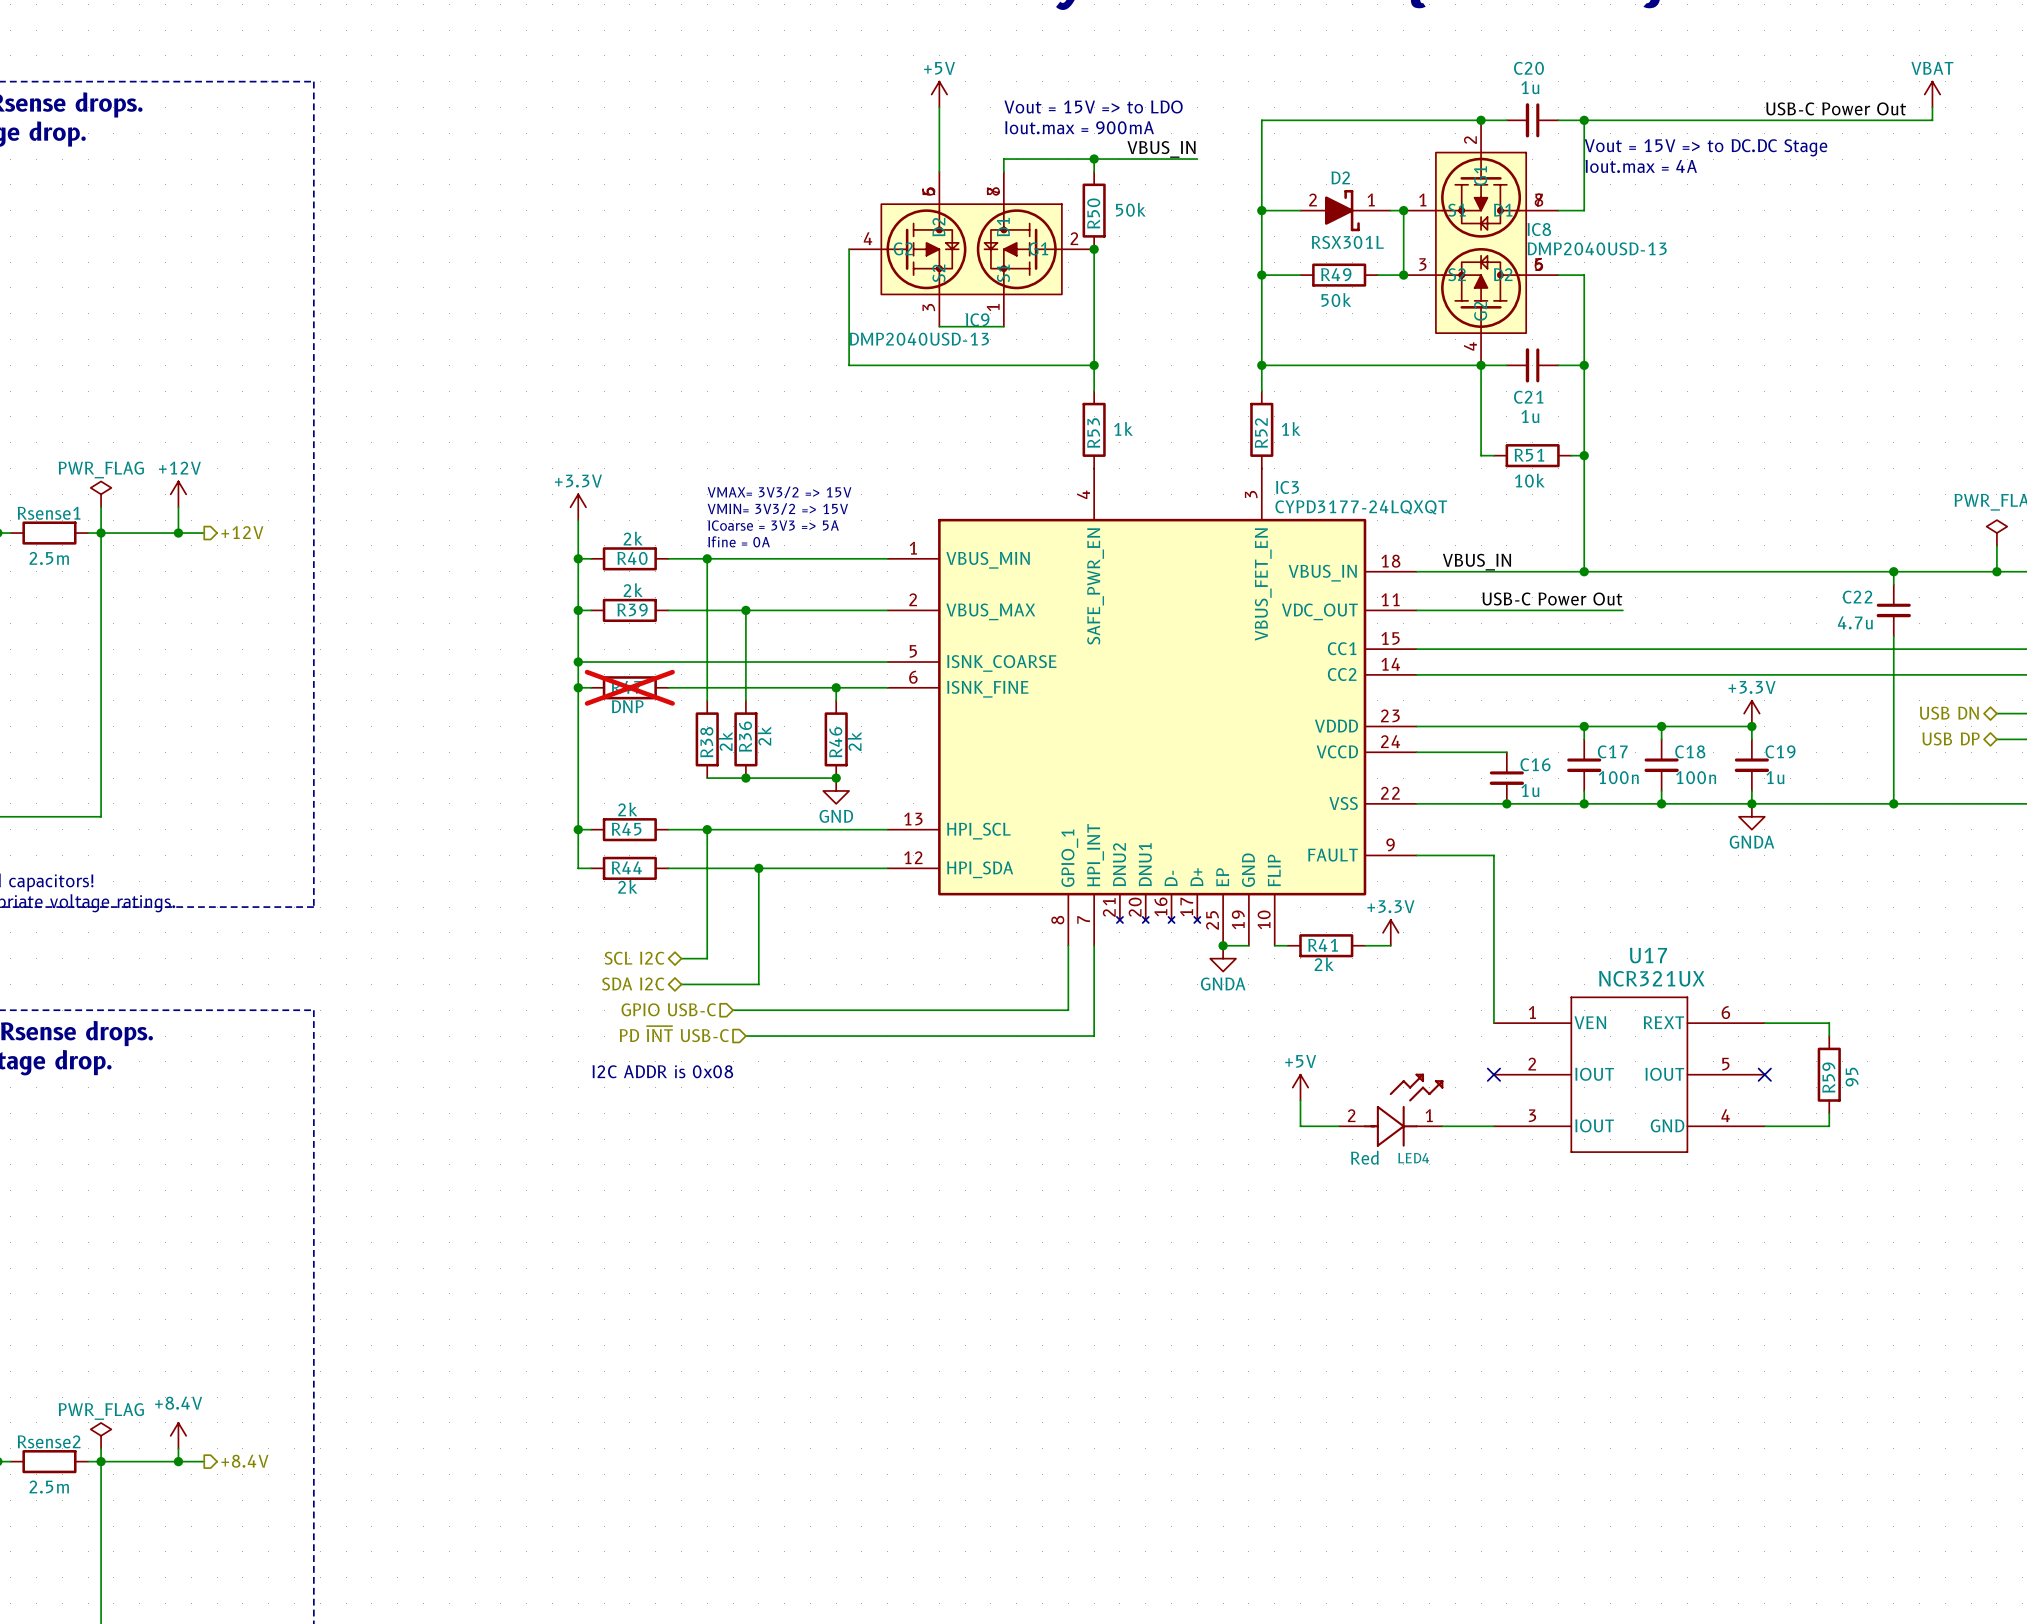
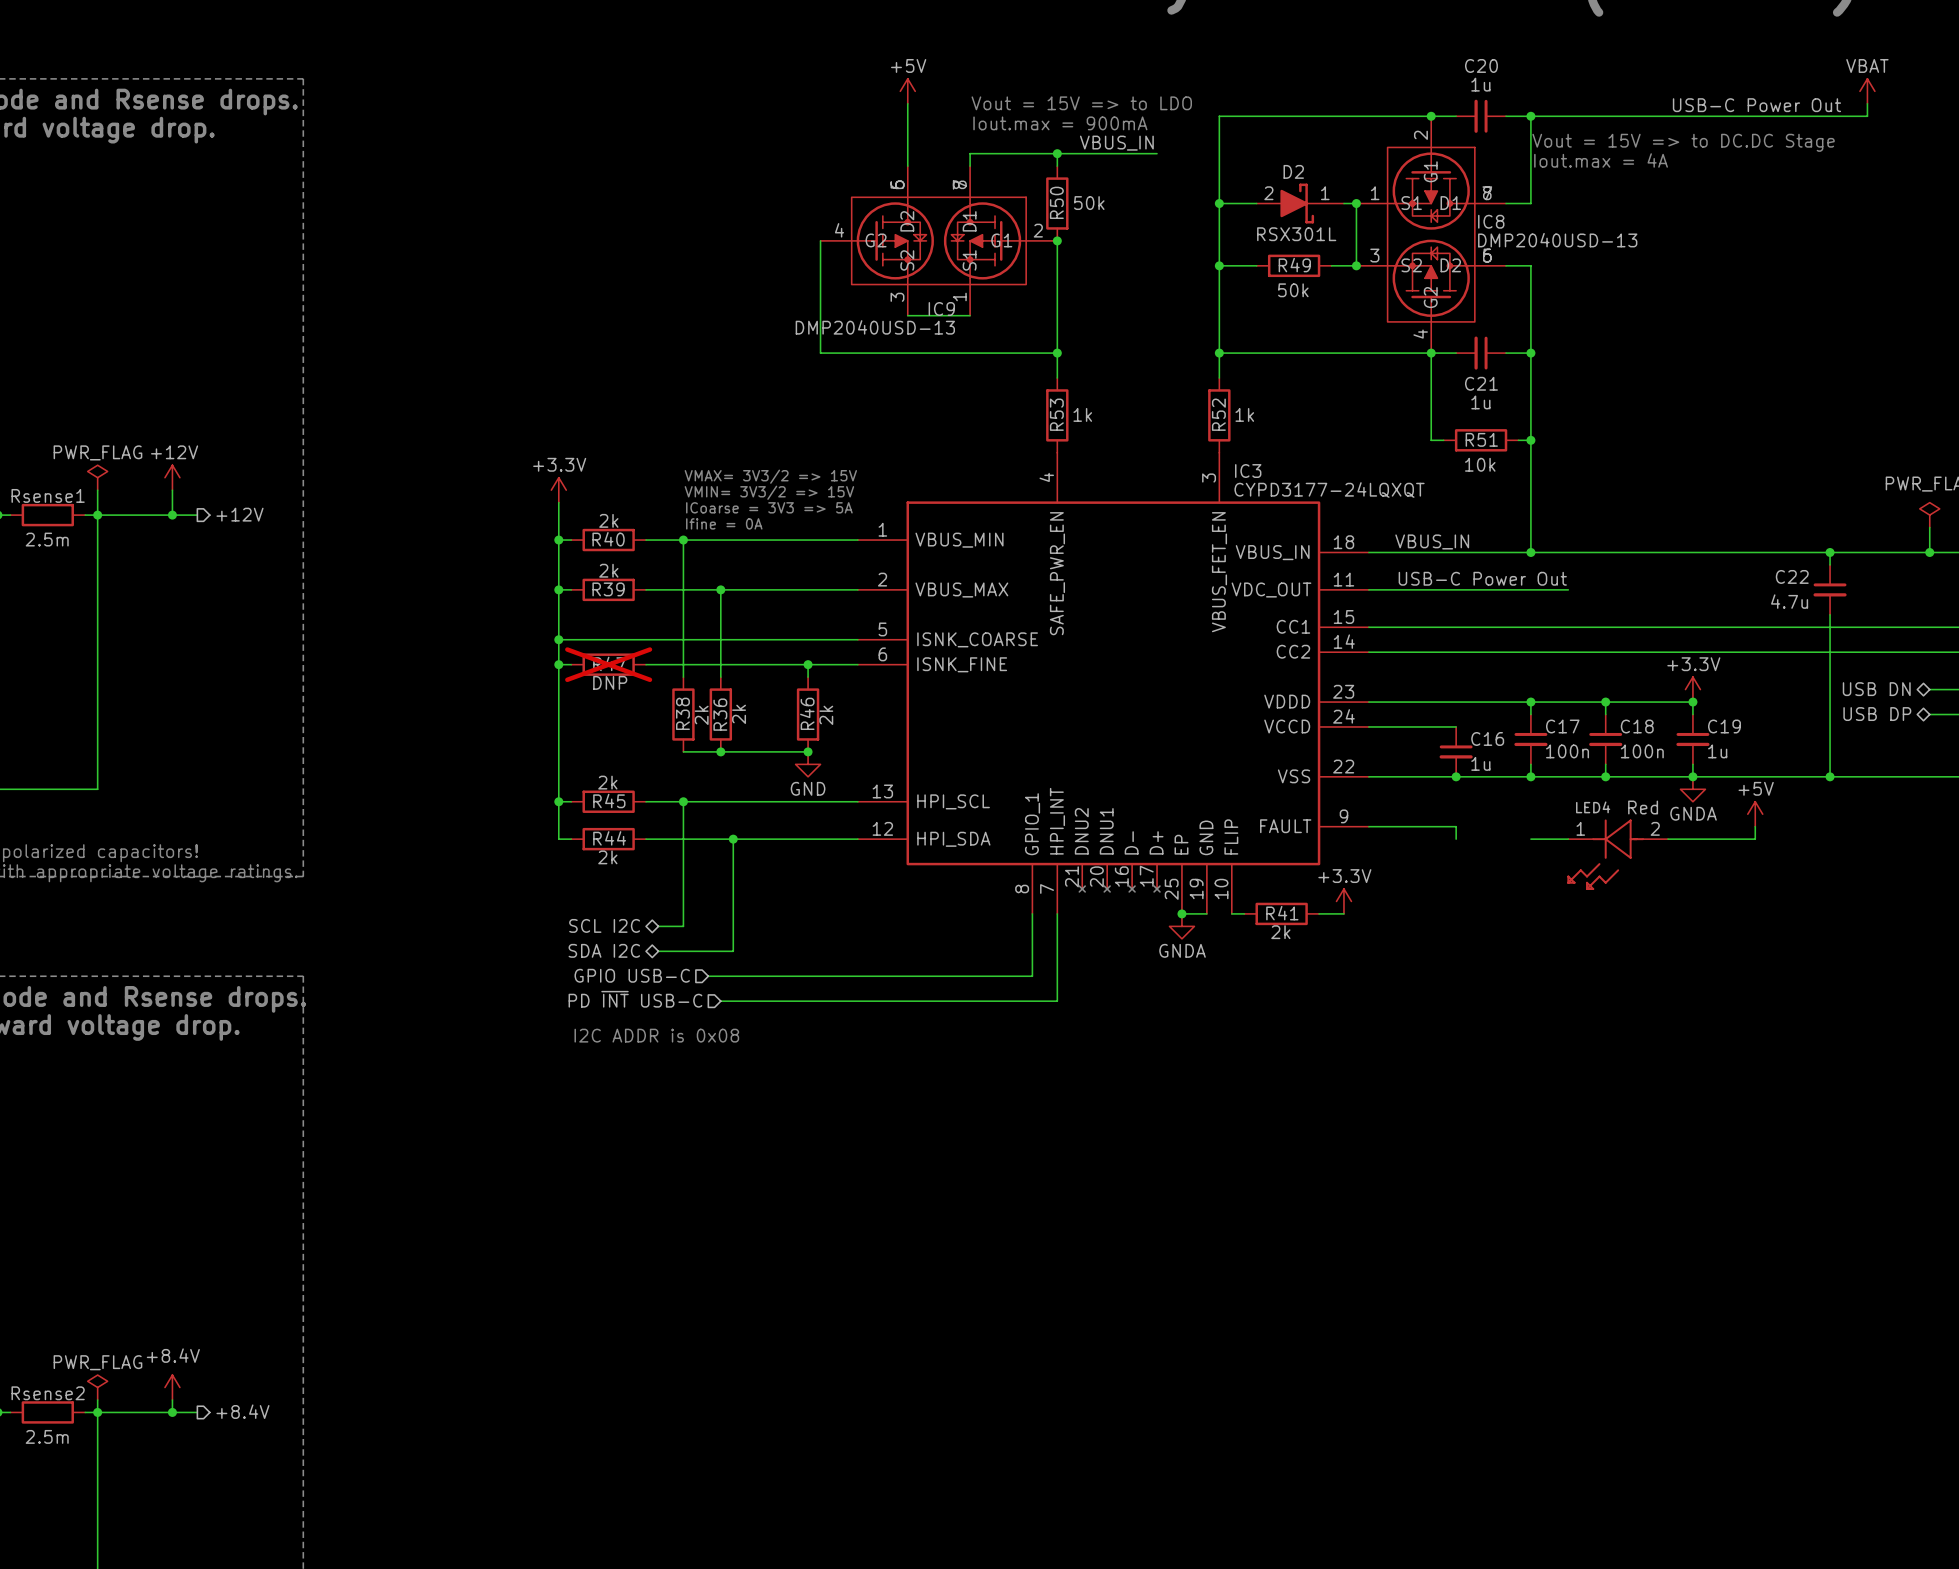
power symbol: none -> +5V (1755, 814)
wire: (1493, 855) (1493, 1023) -> (1443, 826) (1456, 826) (1456, 839)
wire: none -> (1755, 826) (1755, 839) (1668, 839)
wire: none -> (1530, 839) (1568, 839)
wire: (1764, 1023) (1829, 1023) (1829, 1036) -> none
no-connect mark: (1493, 1074) -> none
U17: NCR321UX (1629, 1074) -> none
no-connect mark: (1764, 1074) -> none
R59: 95 (1829, 1074) -> none
power symbol: +5V (1300, 1087) -> none
wire: (1300, 1100) (1300, 1126) (1339, 1126) -> none
LED4 position: (1391, 1110) -> (1617, 854)
LED4 rotation: 0° (1403, 1110) -> 180° (1605, 854)
wire: (1829, 1113) (1829, 1126) (1764, 1126) -> none
wire: (1442, 1126) (1493, 1126) -> none

